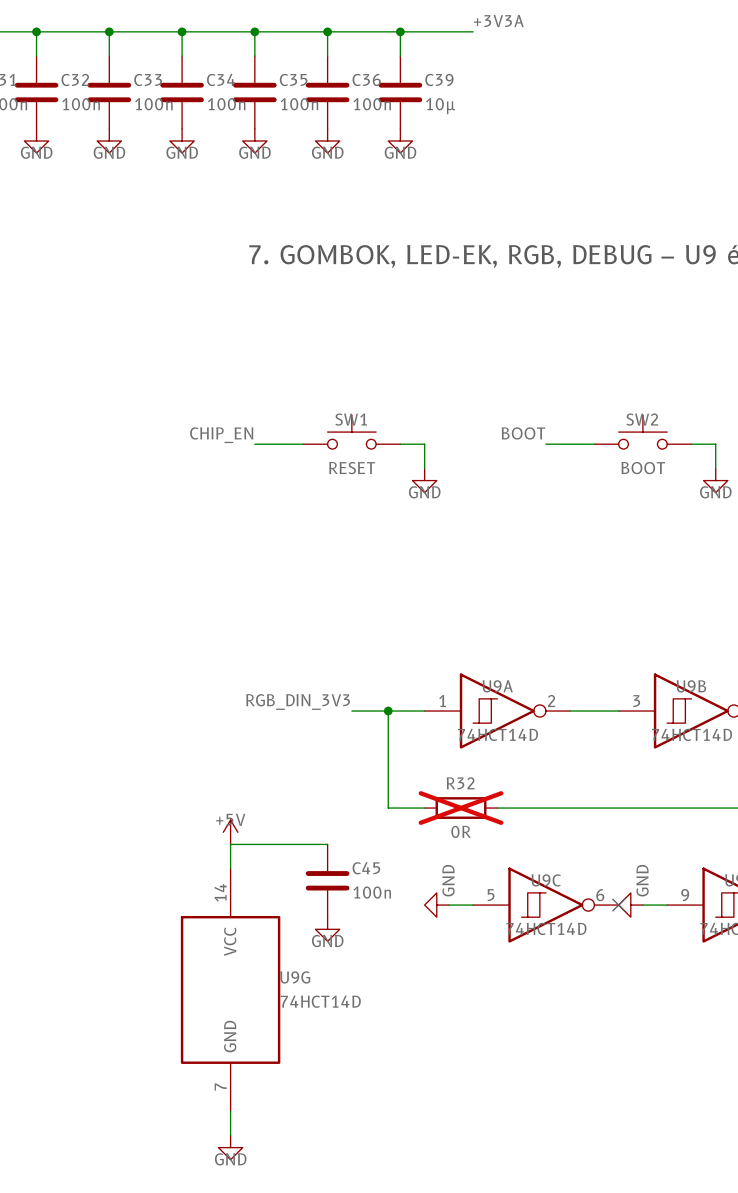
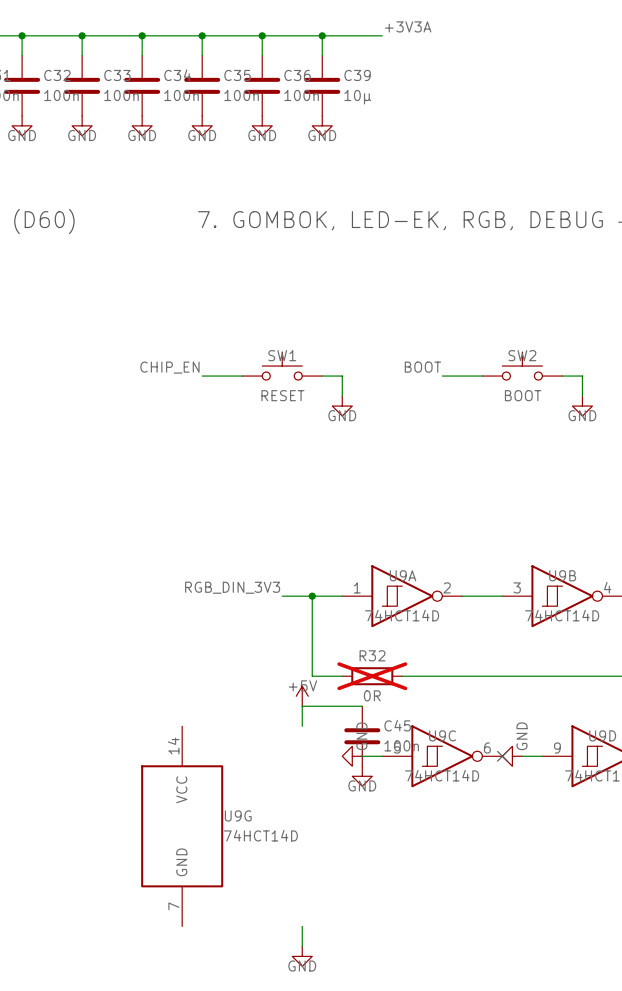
power symbol position: +5V (230, 832) -> +5V (302, 696)
wire: (327, 844) (230, 844) (230, 868) -> none
wire: none -> (362, 706) (302, 706) (302, 726)
C45 position: (327, 880) -> (362, 736)
power symbol: GND (327, 929) -> none
power symbol: none -> GND (362, 776)
wire: (230, 1111) (230, 1135) -> (302, 926) (302, 946)
power symbol: GND (230, 1147) -> none
power symbol: none -> GND (302, 956)

